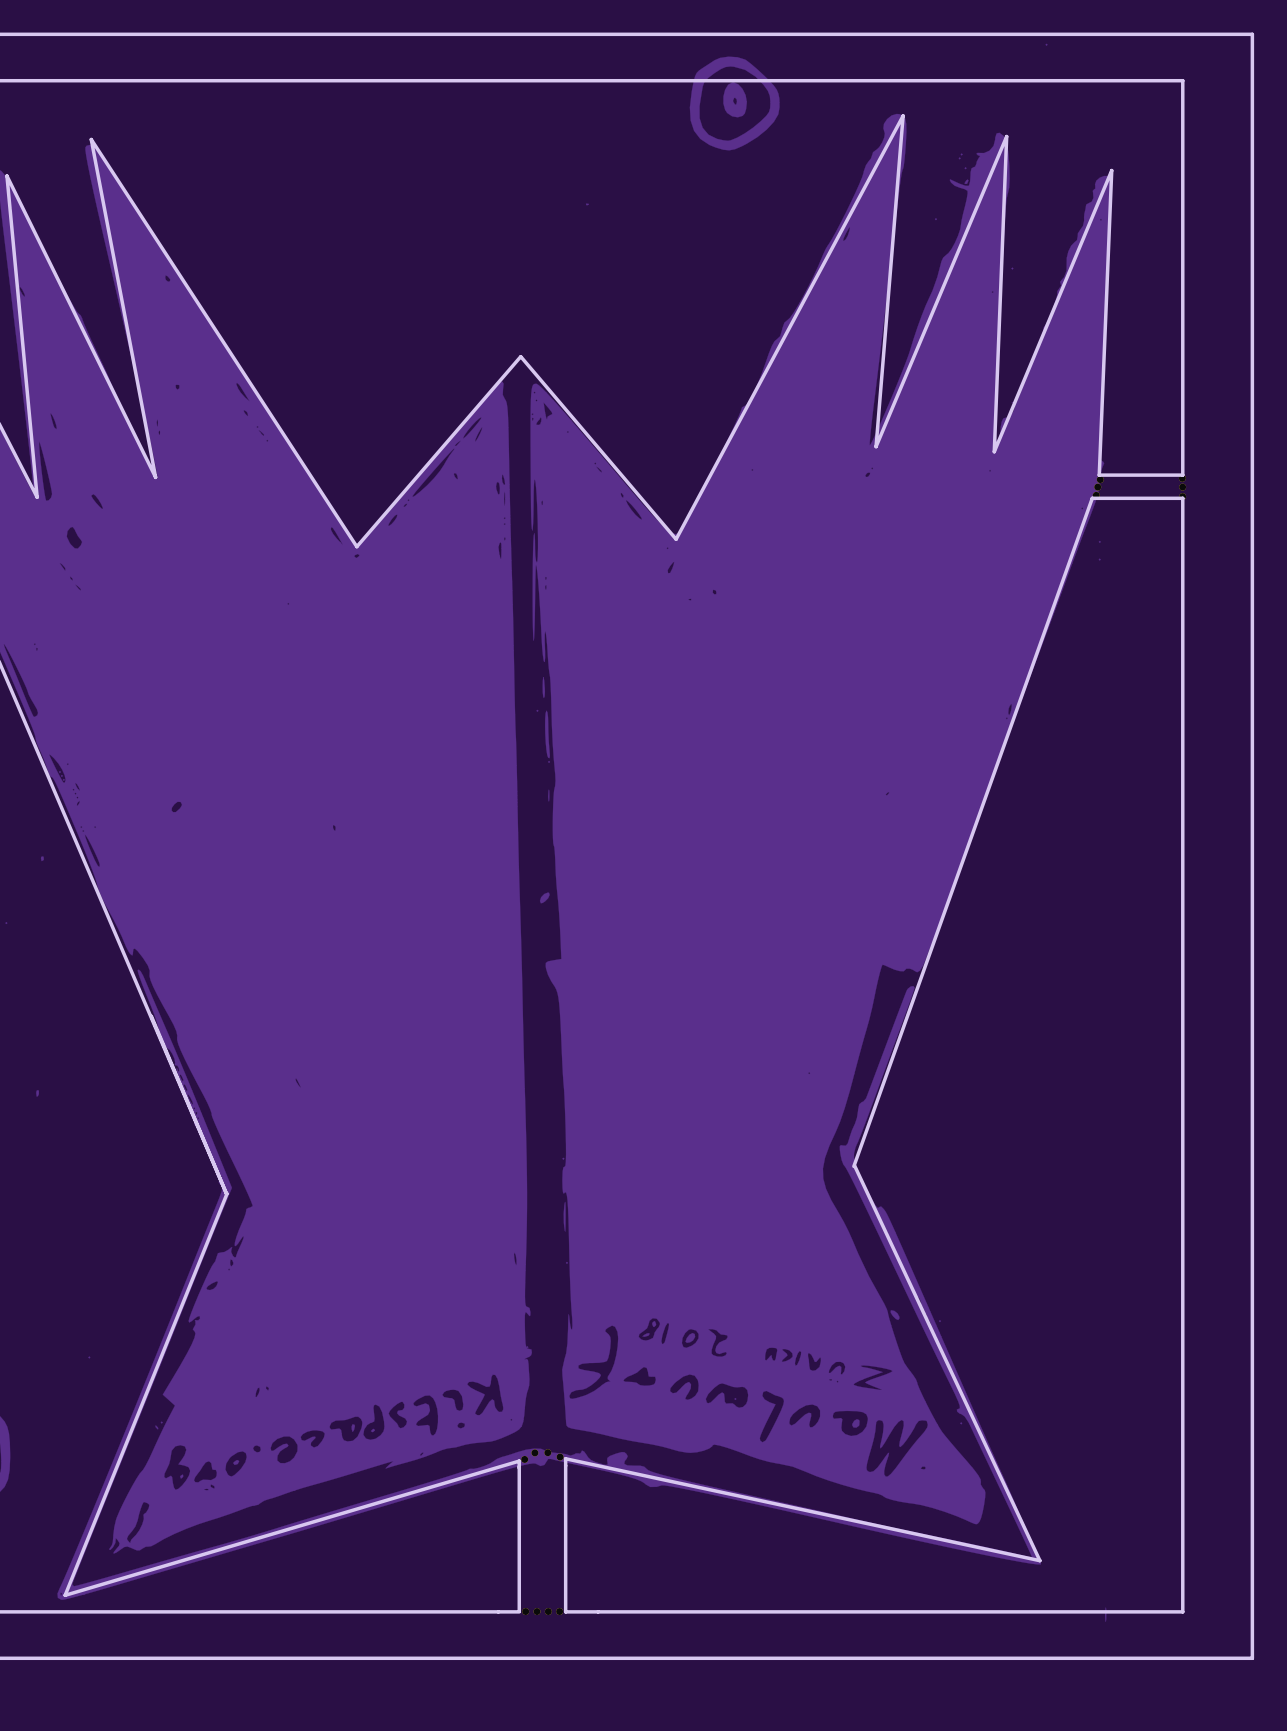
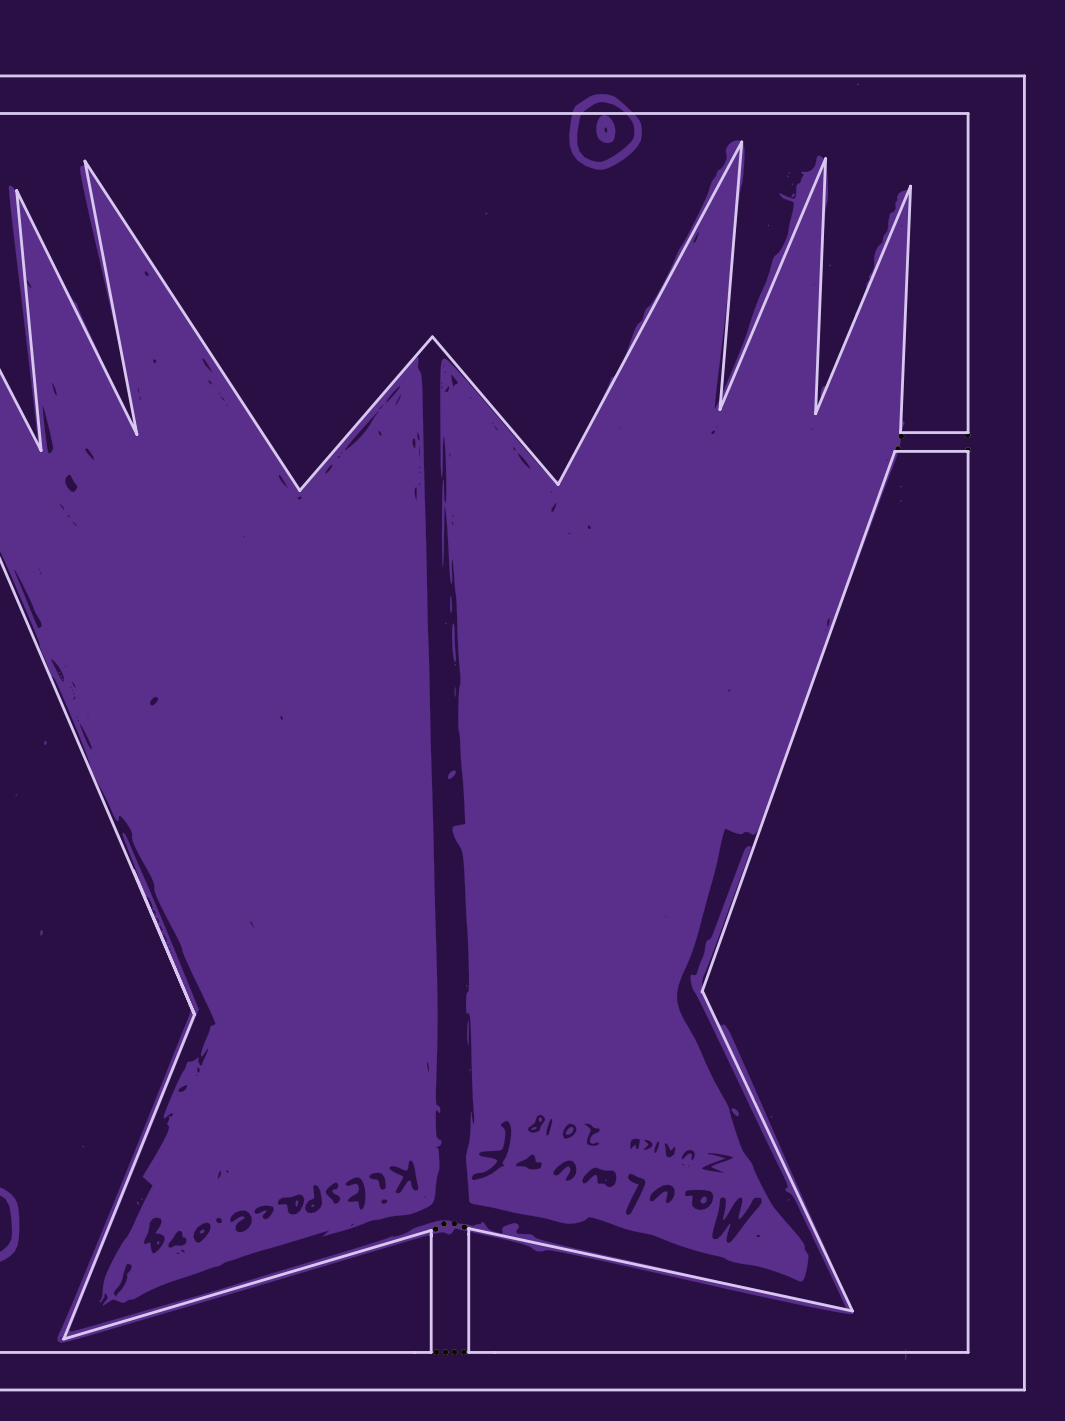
part: (1097, 487) -> none
part: (1182, 487) -> none

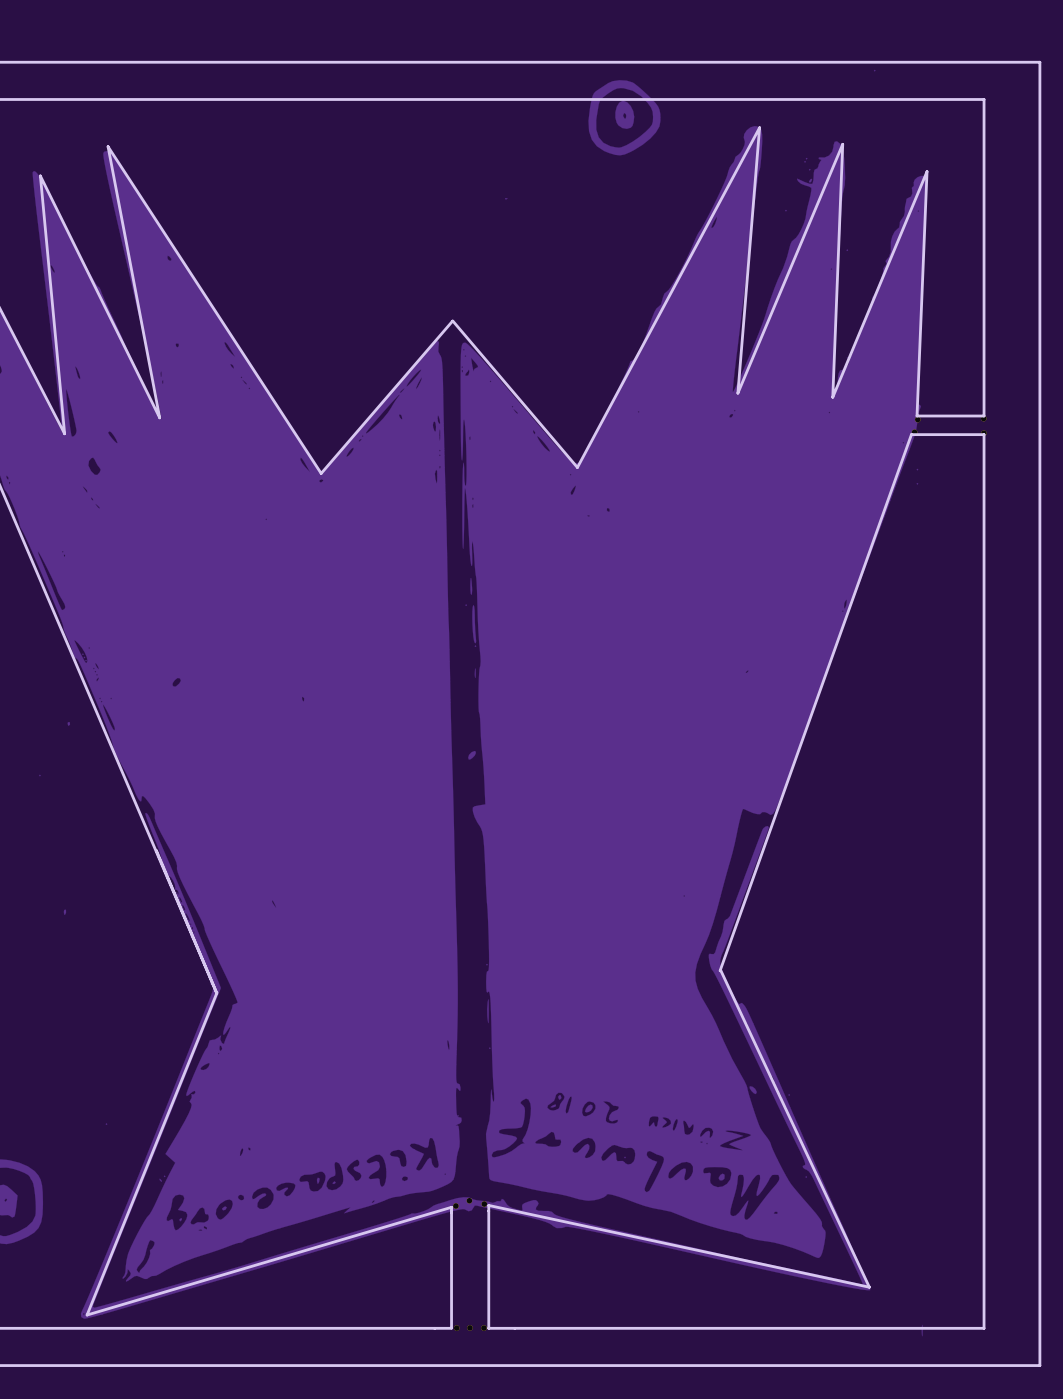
part: (443, 1223) -> none
part: none -> (469, 1200)
part: (454, 1223) -> none
part: (445, 1352) -> none
part: none -> (469, 1327)
part: (454, 1352) -> none

